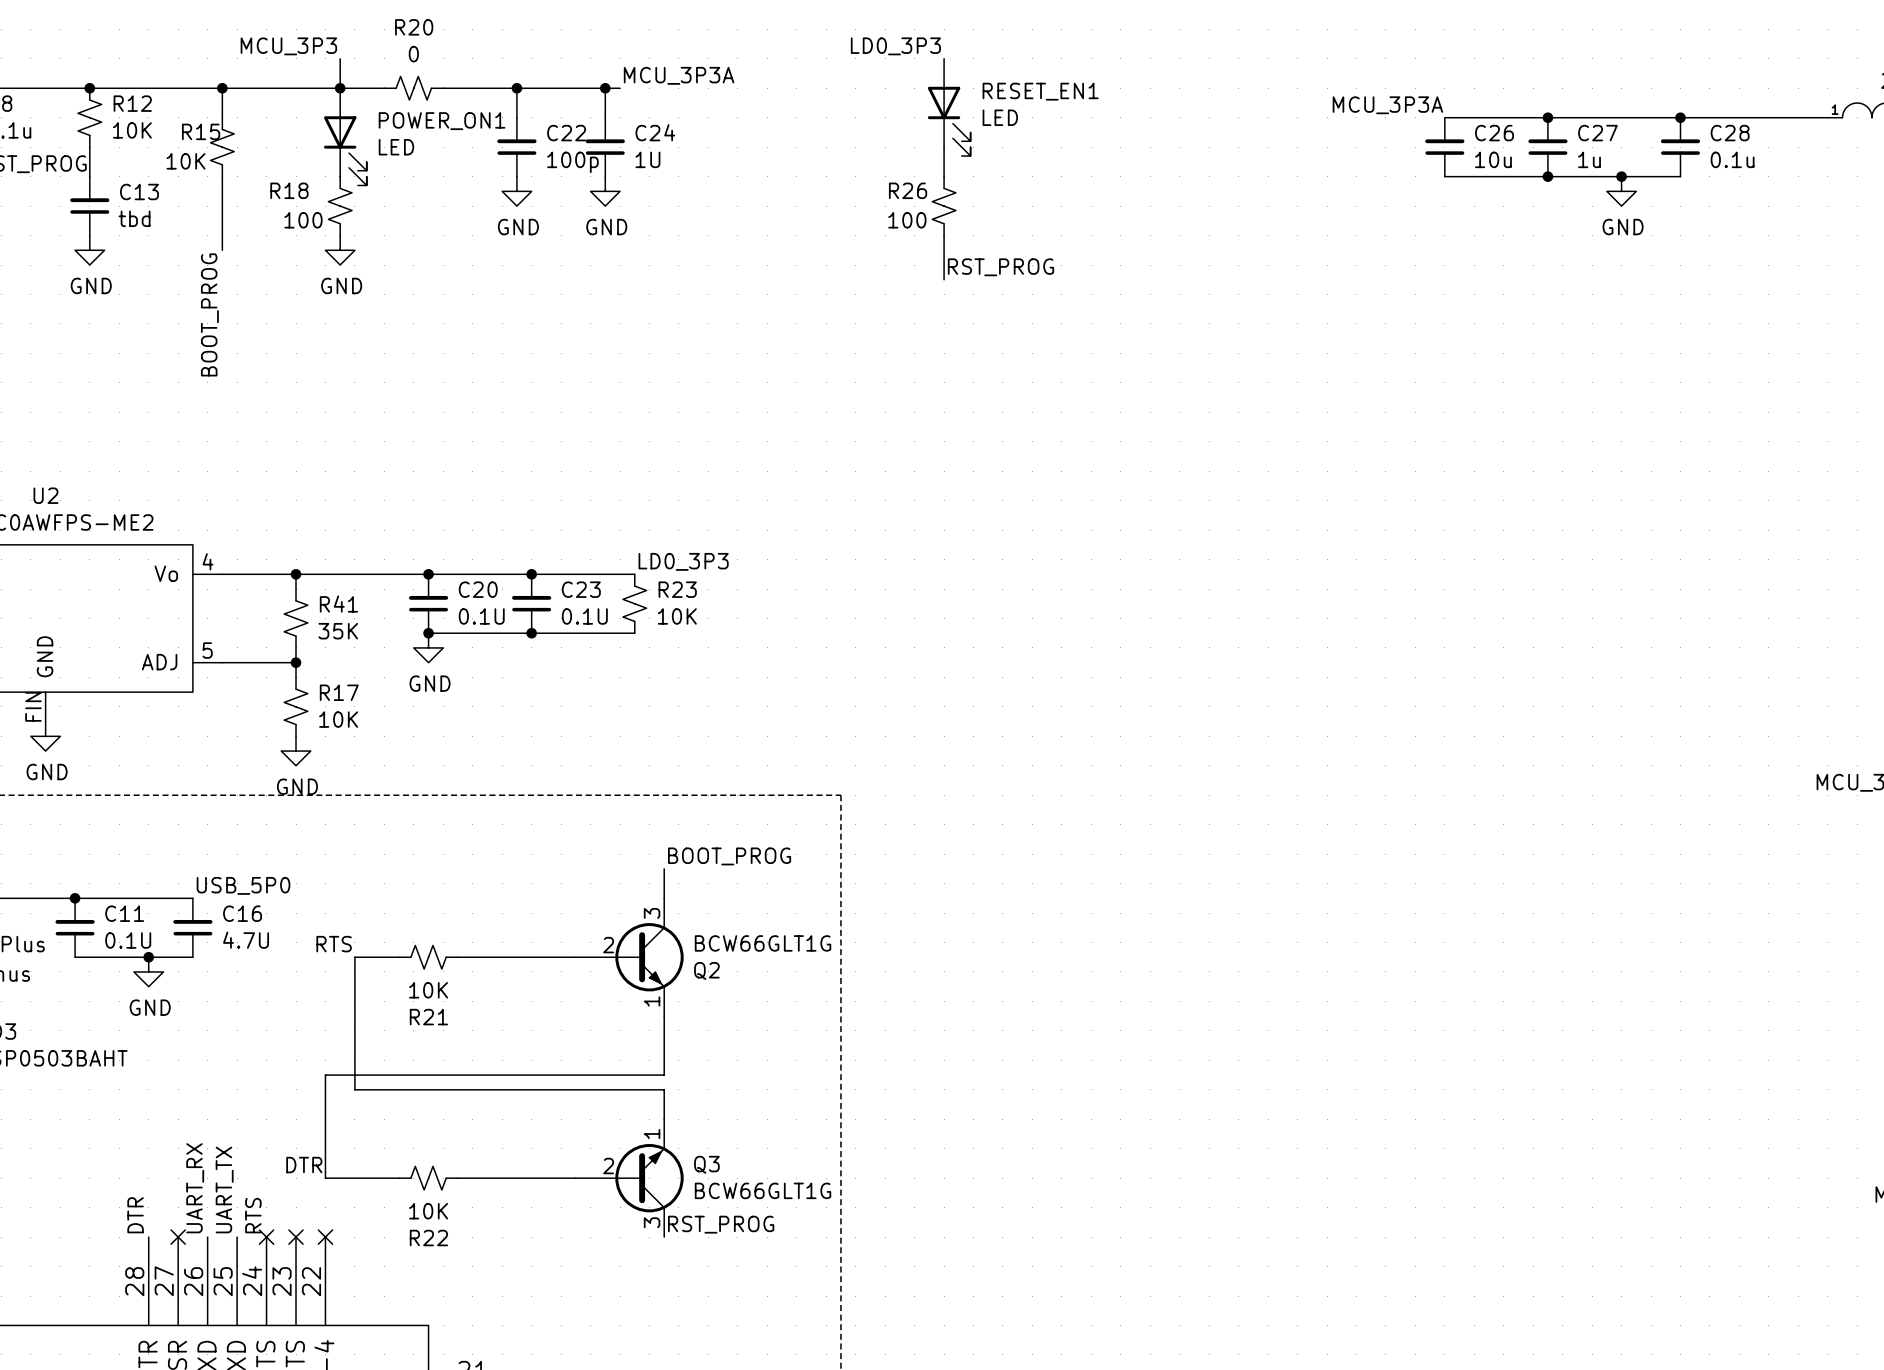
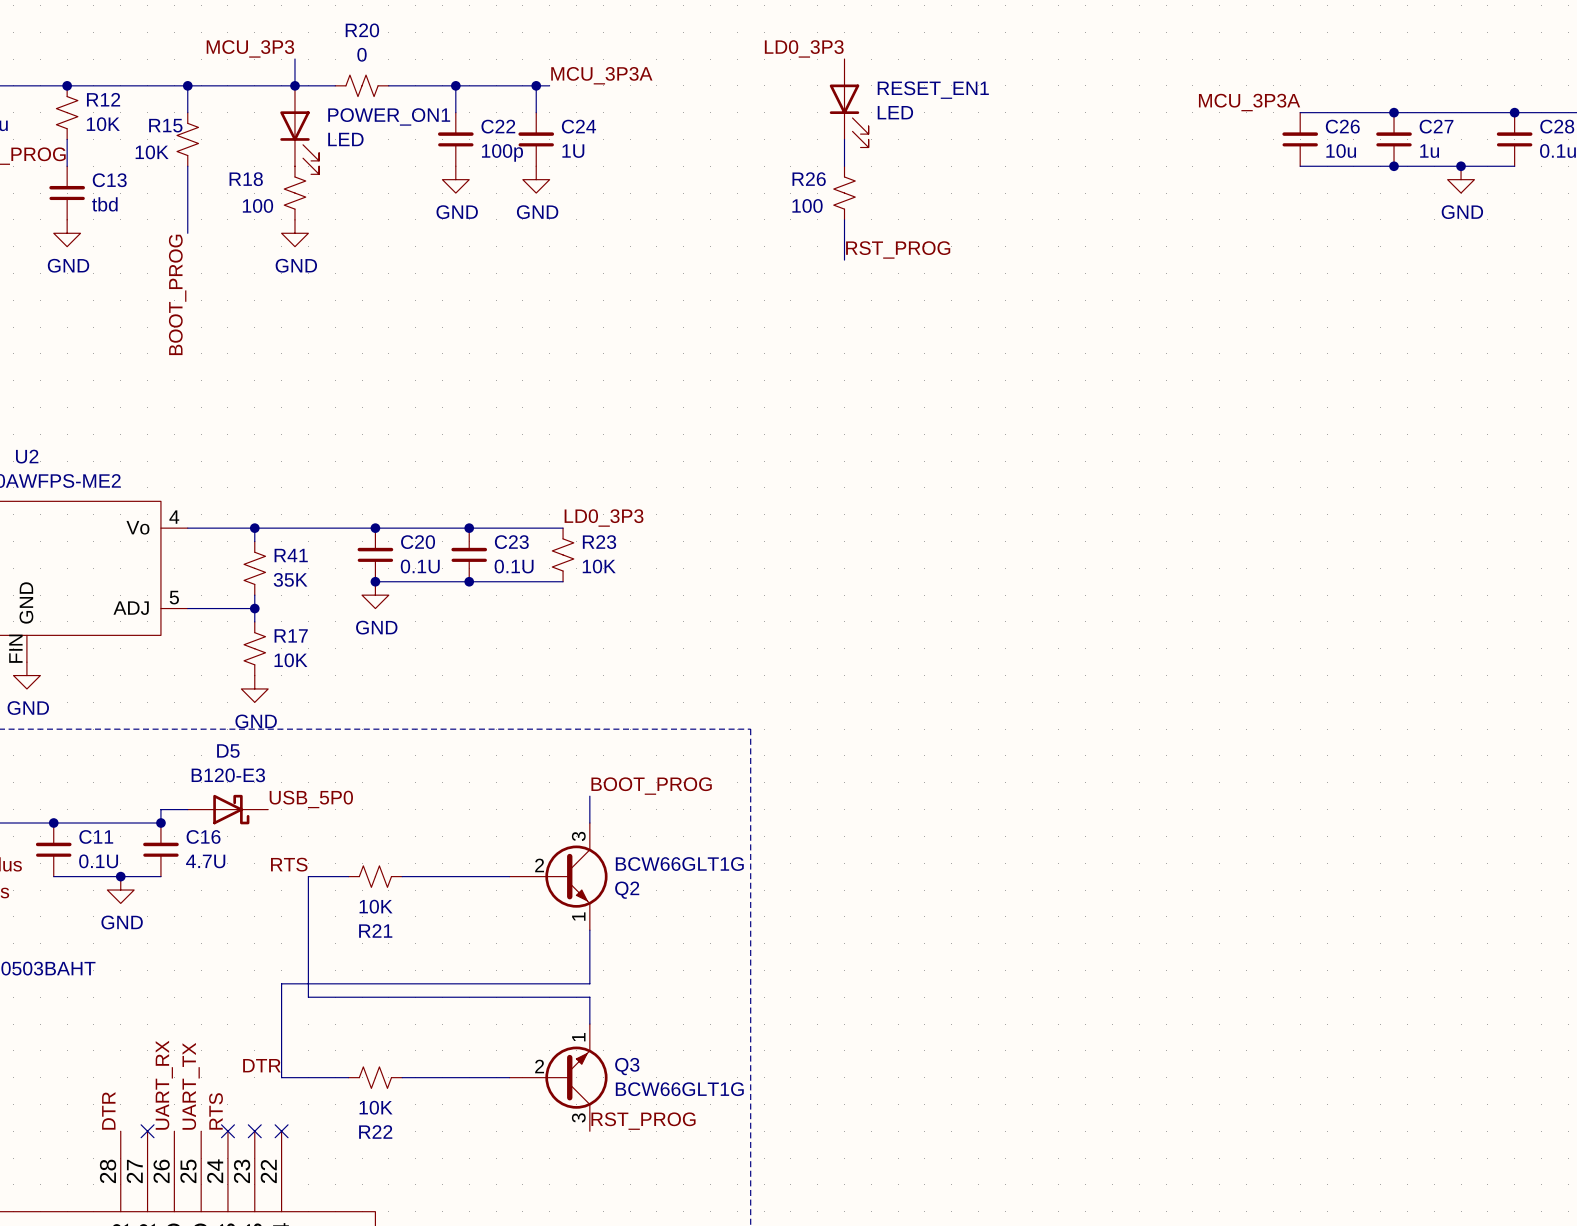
wire: none -> (187, 809) (160, 809) (160, 823)
D5: none -> B120-E3 (227, 809)
label position: USB_5P0 (243, 885) -> USB_5P0 (311, 799)
junction: none -> (160, 823)

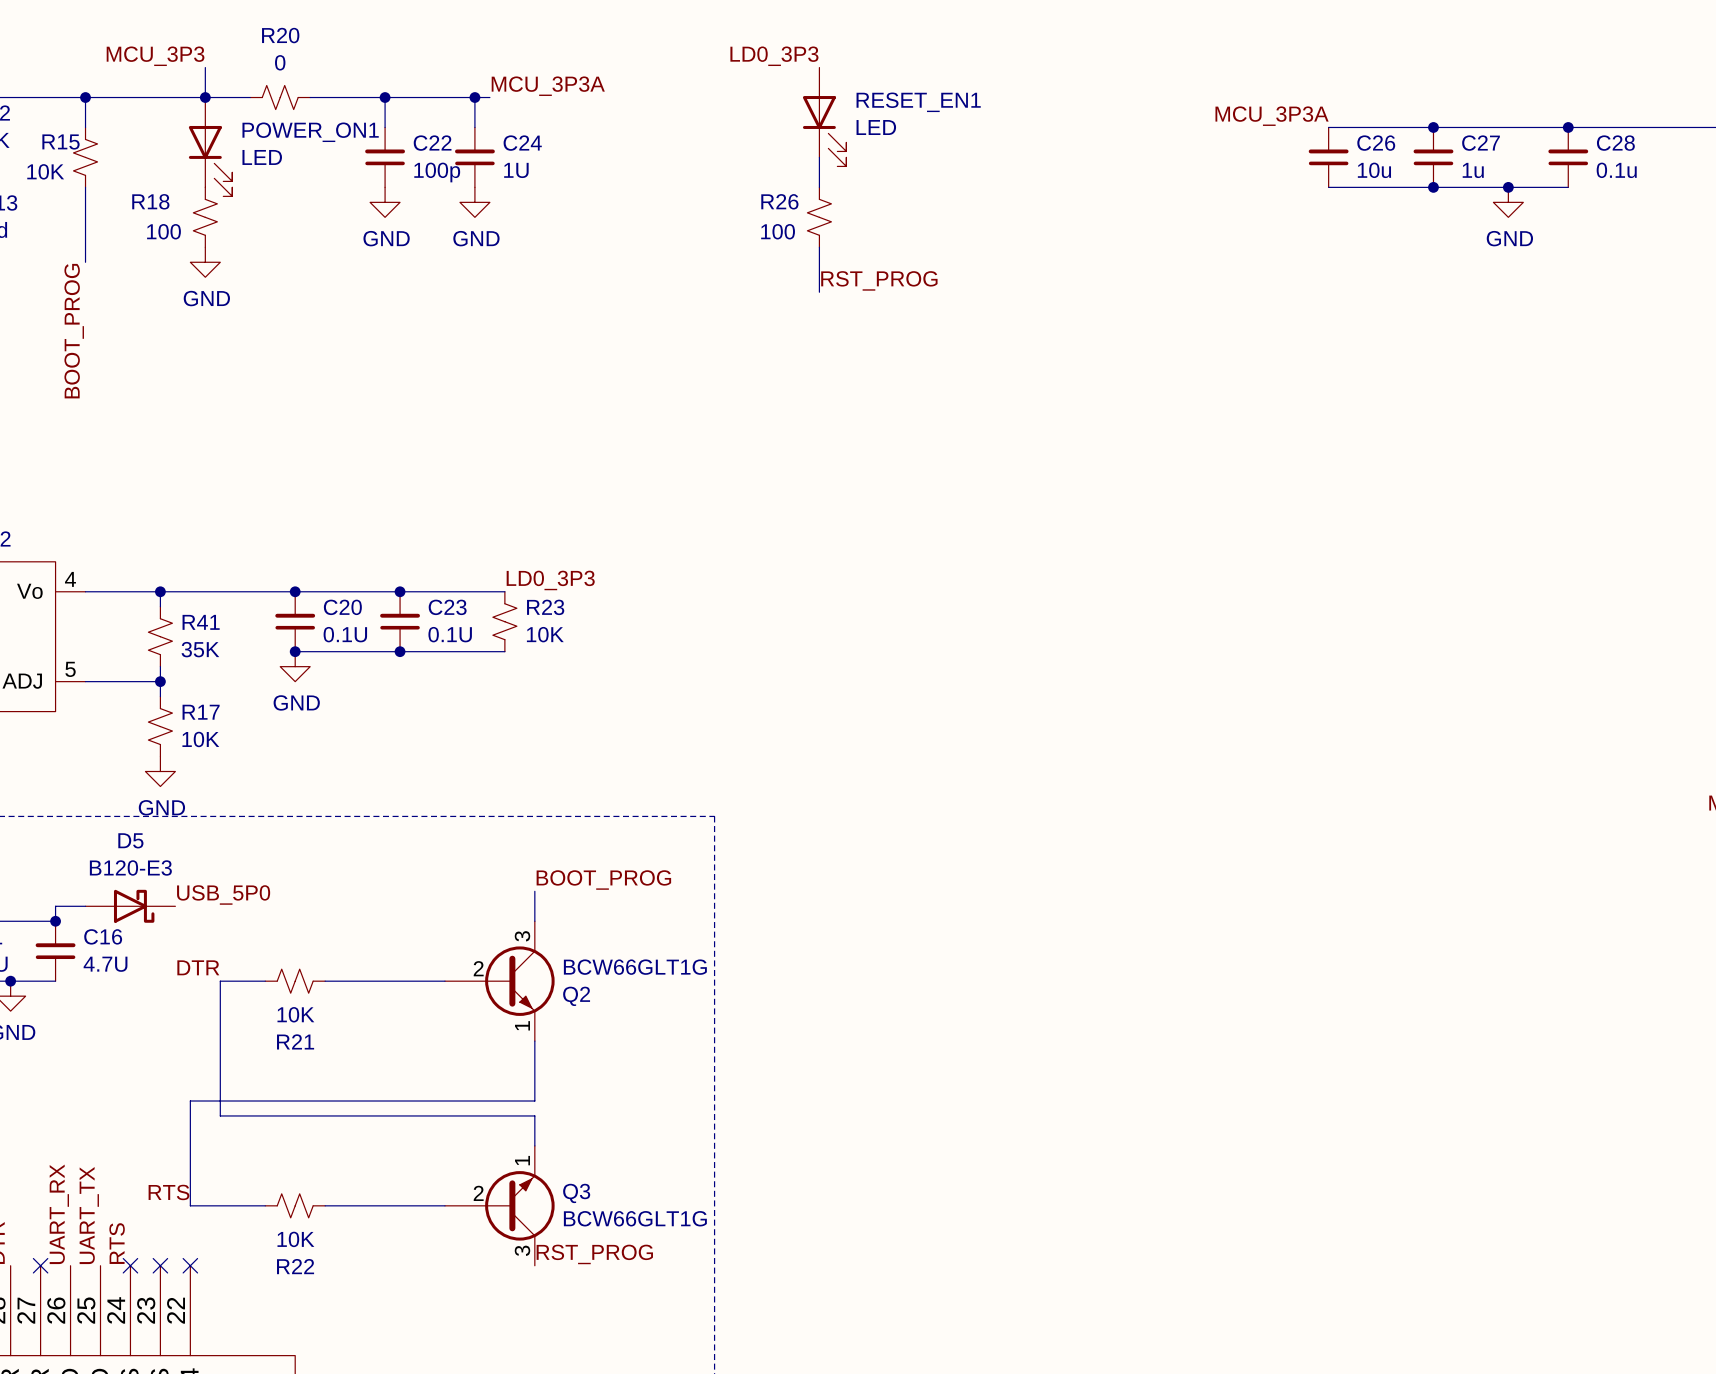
label: RTS (289, 864) -> DTR (198, 967)
label: DTR (261, 1065) -> RTS (168, 1192)

